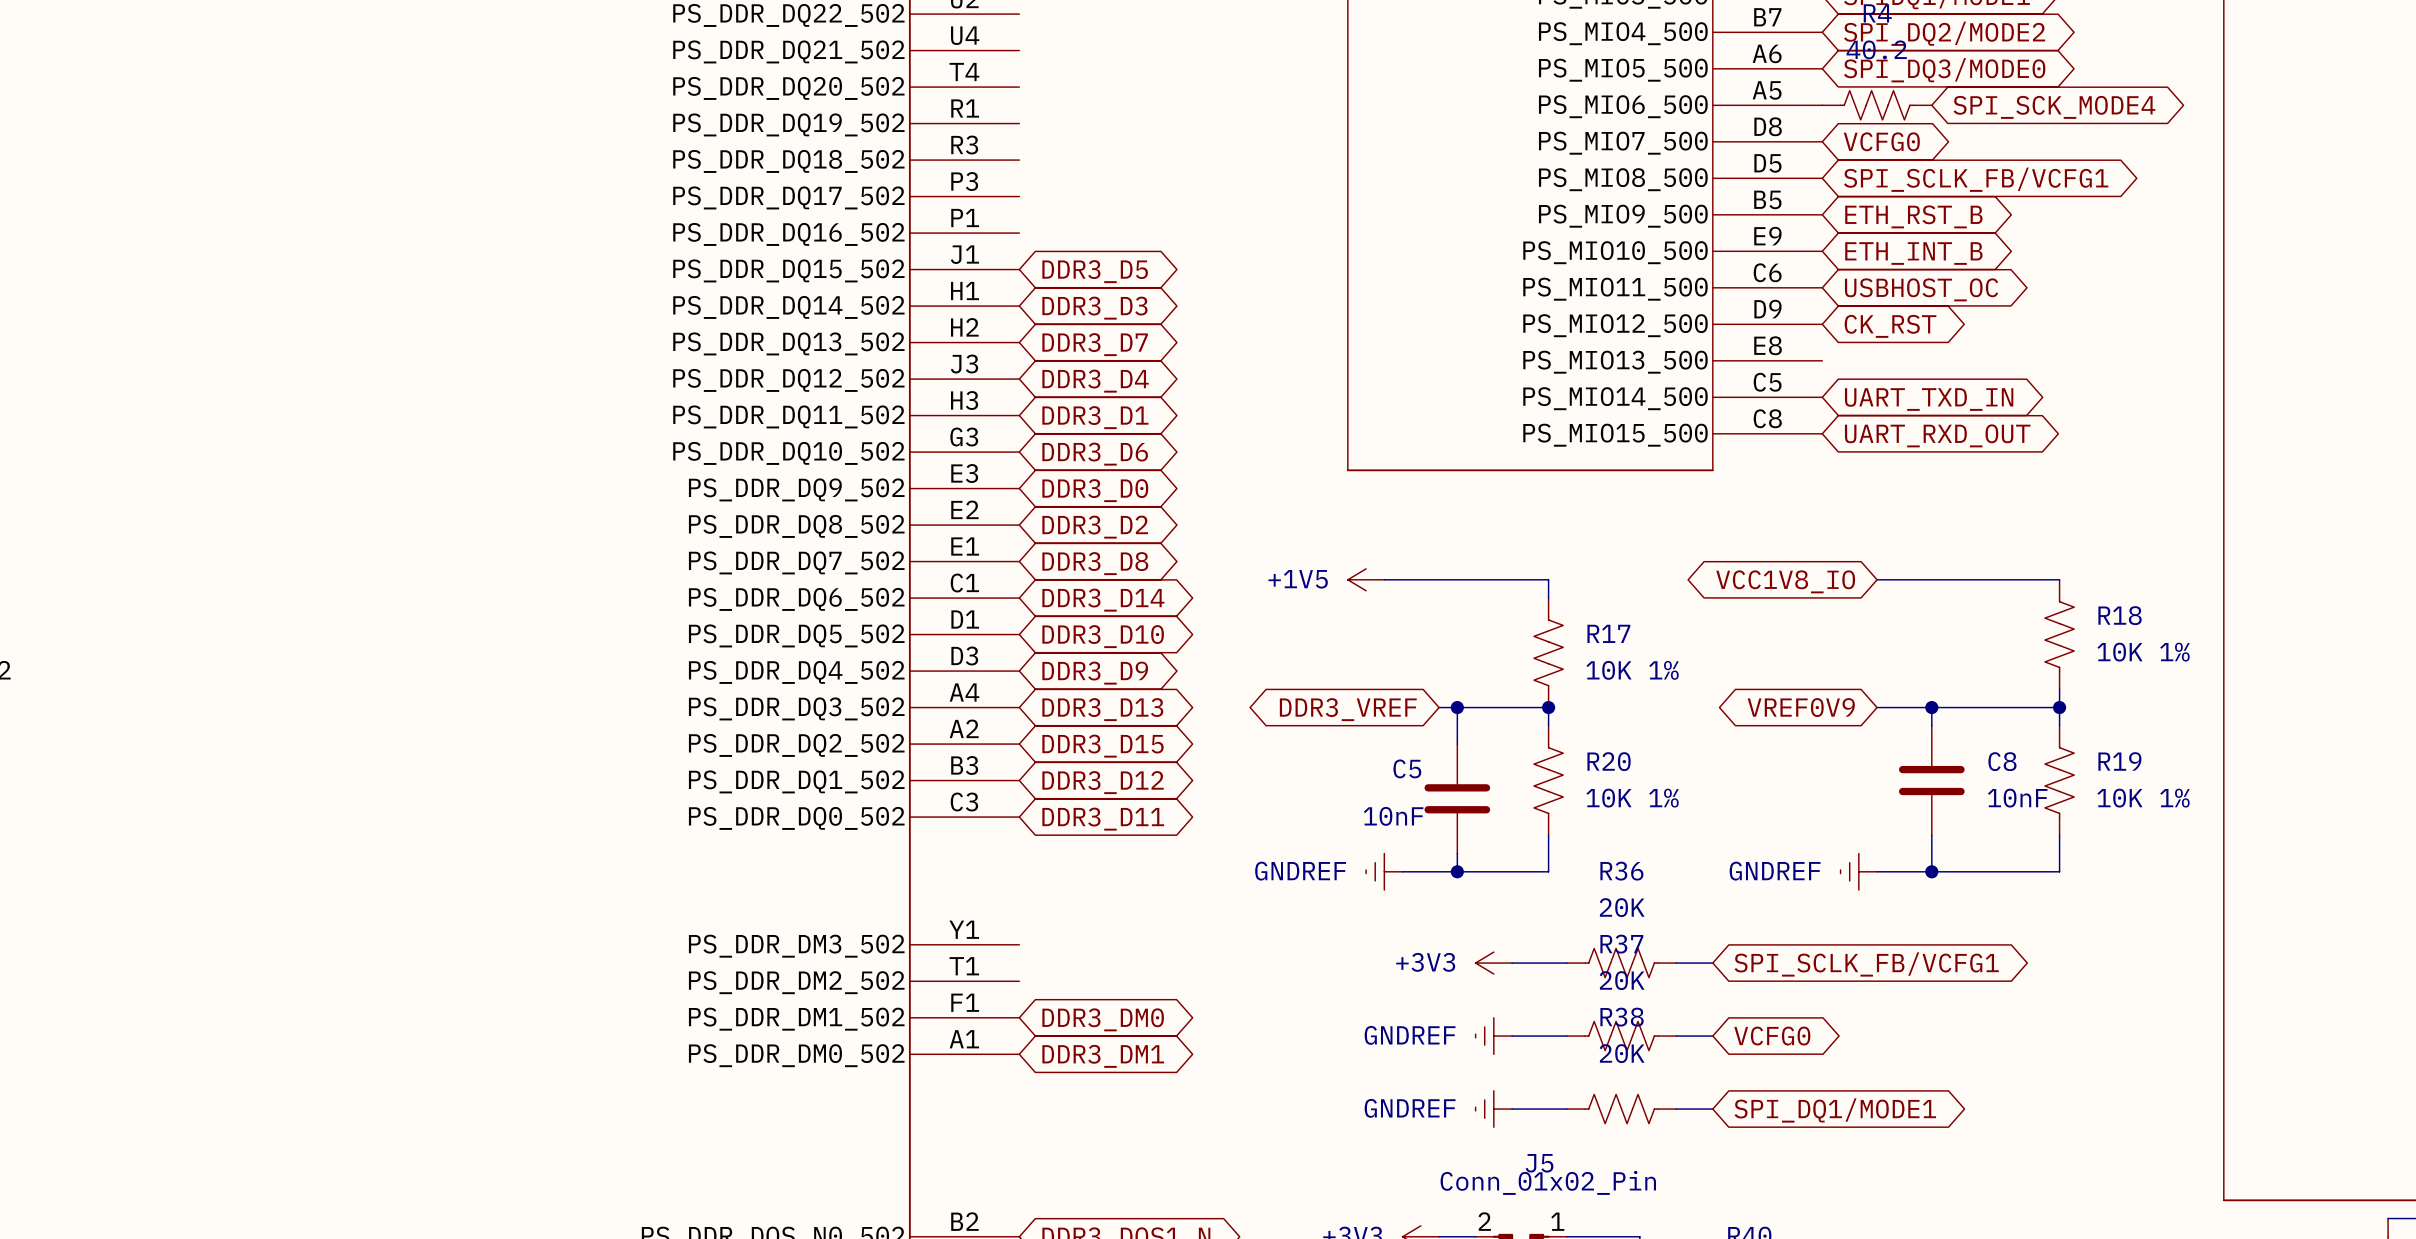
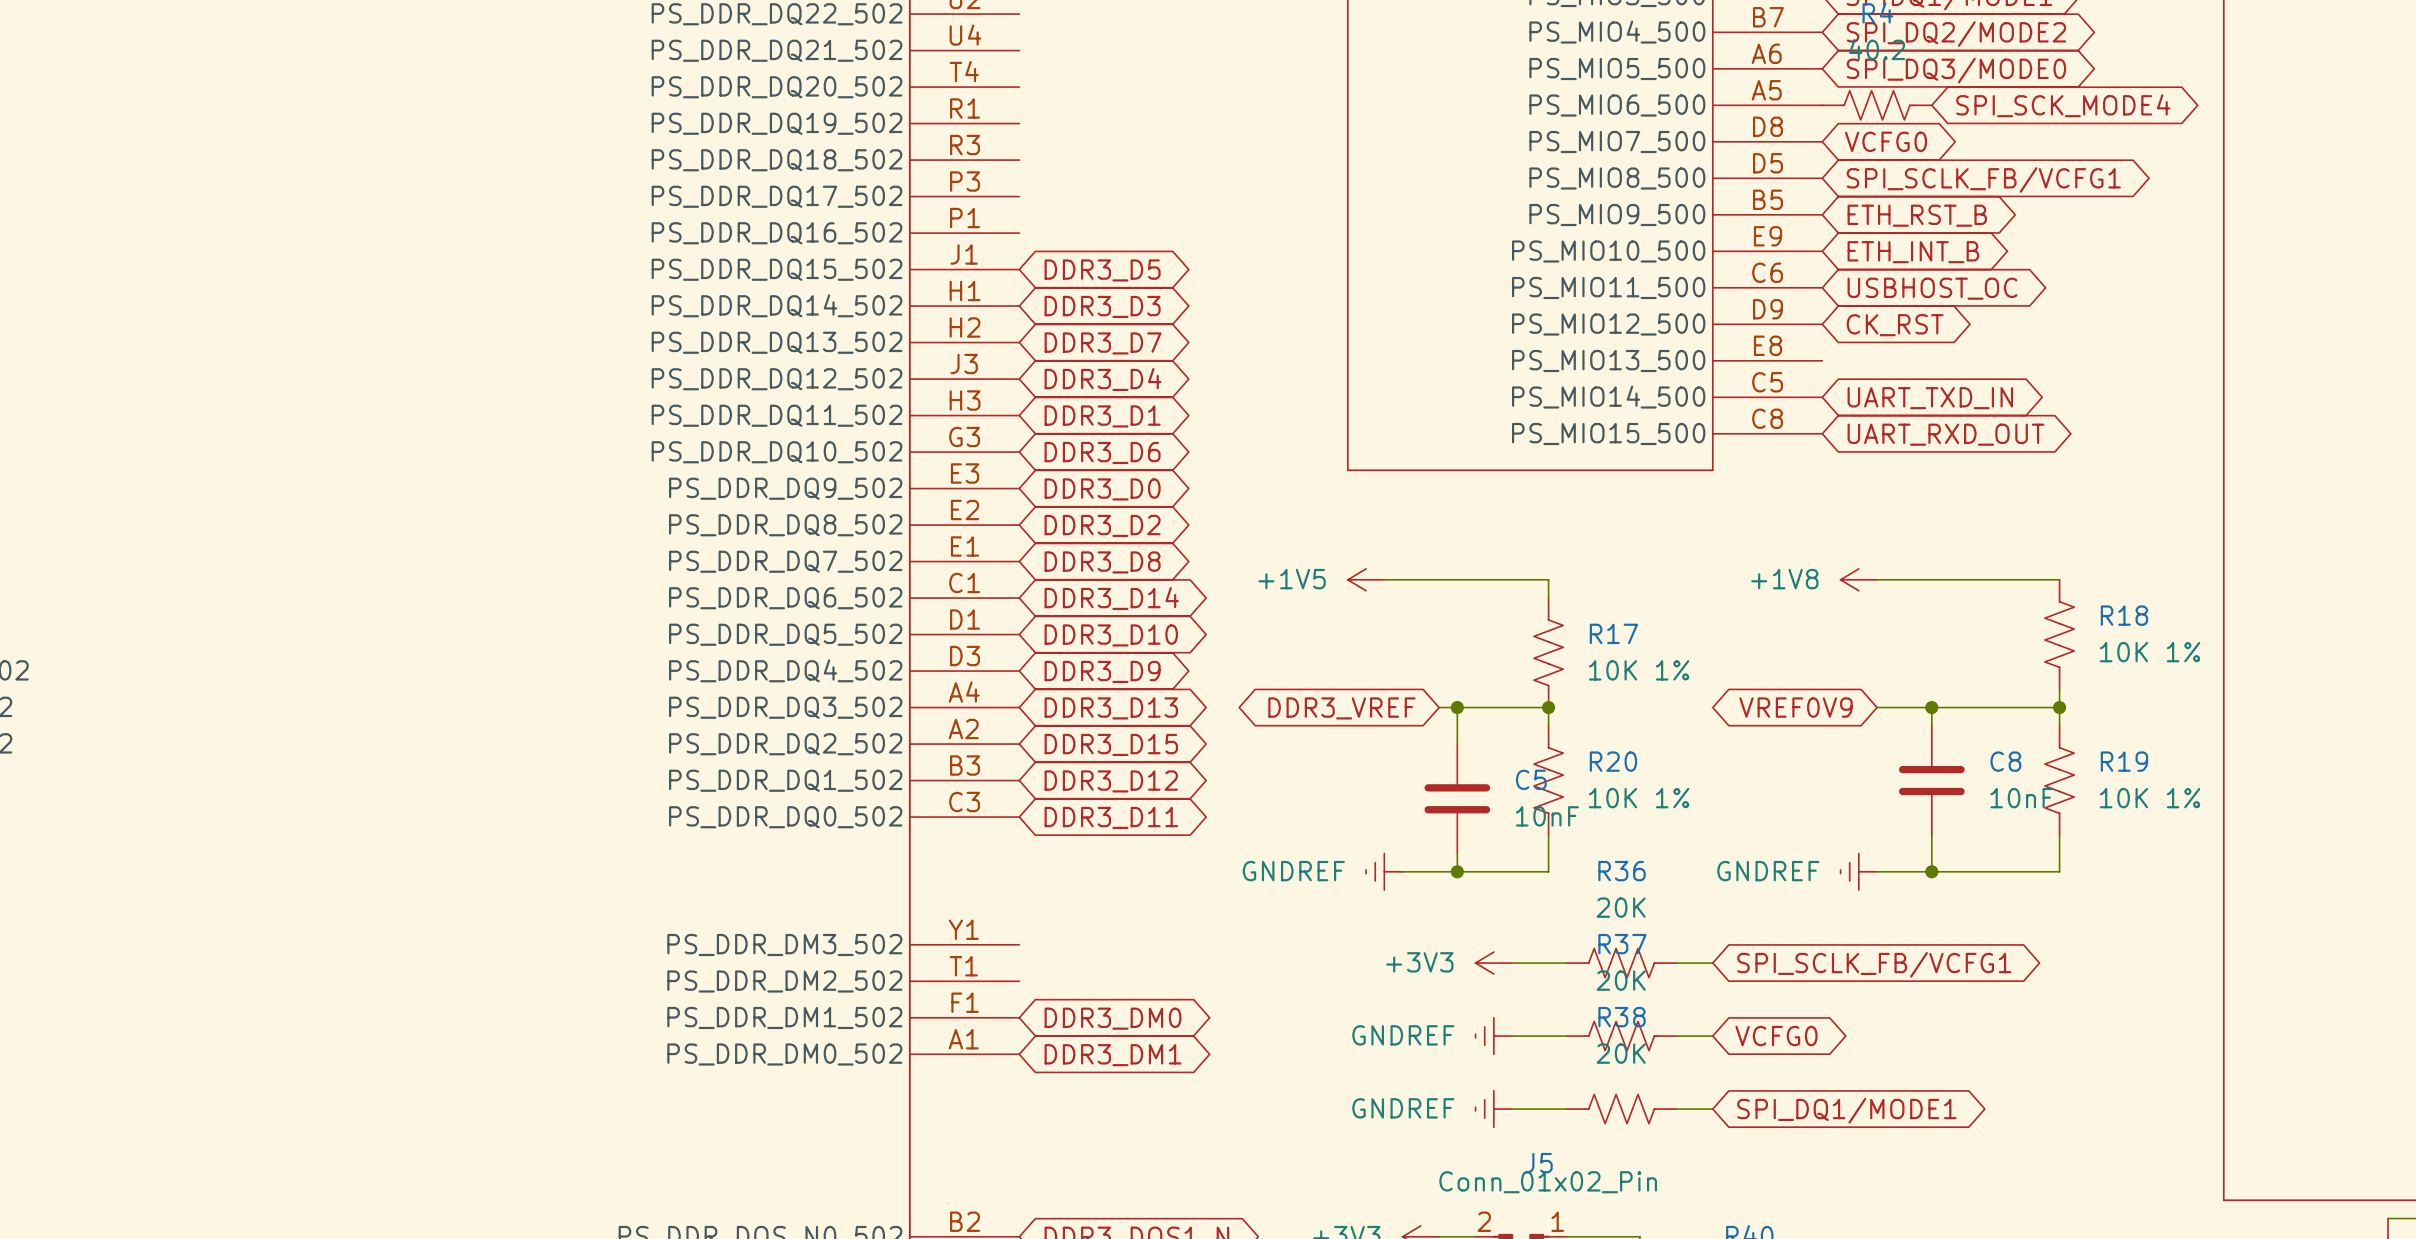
power symbol: none -> +1V8 (1858, 579)
global label: VCC1V8_IO (1785, 581) -> none
C5 name position: C5 (1407, 768) -> C5 (1531, 779)
C5 value position: 10nF (1393, 816) -> 10nF (1547, 816)

